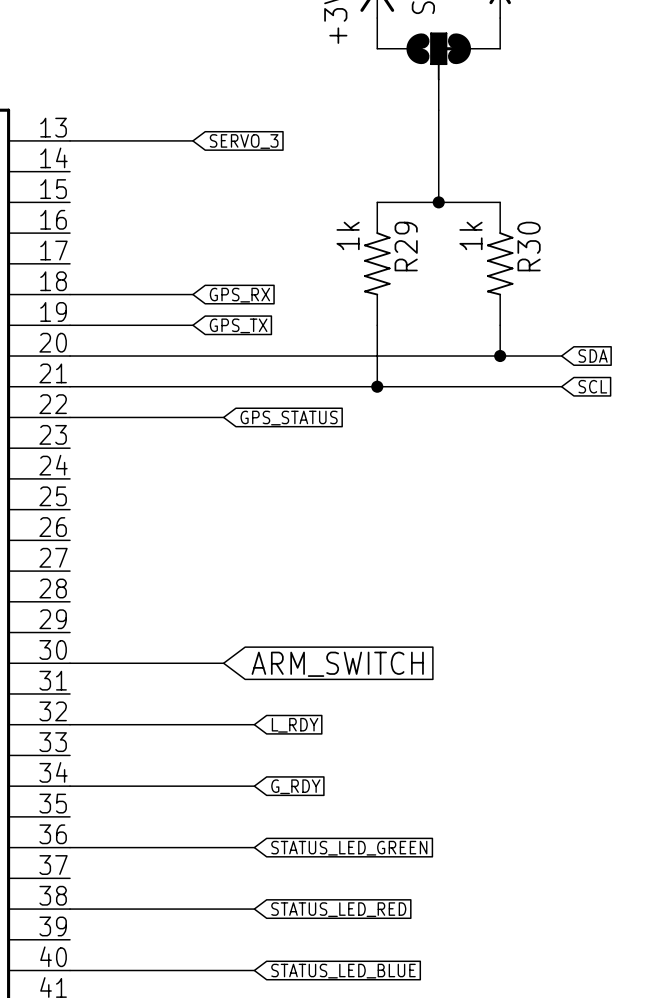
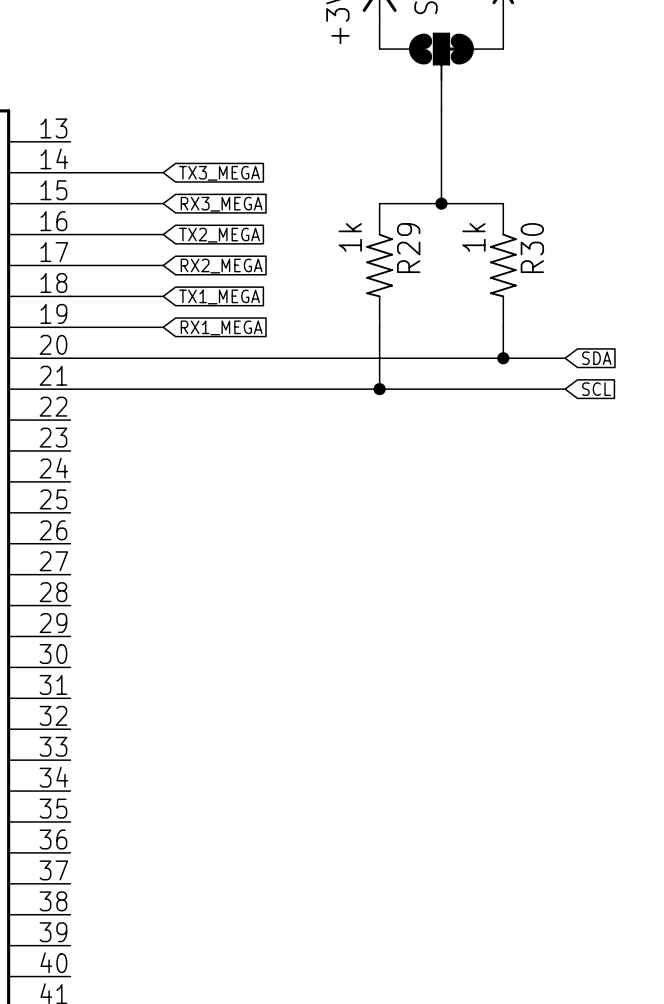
wire: (70, 140) (192, 140) -> none
global label: SERVO_3 (244, 141) -> none
wire: none -> (70, 172) (163, 172)
global label: none -> TX3_MEGA (219, 173)
wire: none -> (70, 203) (163, 203)
global label: none -> RX3_MEGA (221, 204)
wire: none -> (70, 234) (163, 234)
global label: none -> TX2_MEGA (219, 235)
wire: none -> (70, 265) (163, 265)
global label: none -> RX2_MEGA (221, 266)
wire: (162, 294) (192, 294) -> none
global label: none -> TX1_MEGA (219, 296)
global label: GPS_RX (239, 295) -> none
wire: (162, 325) (192, 325) -> none
global label: none -> RX1_MEGA (221, 327)
global label: GPS_TX (238, 325) -> none
wire: (70, 417) (223, 417) -> none
global label: GPS_STATUS (289, 418) -> none
wire: (70, 663) (223, 663) -> none
global label: ARM_SWITCH (337, 664) -> none
wire: (70, 724) (254, 724) -> none
global label: L_RDY (295, 725) -> none
wire: (70, 786) (254, 786) -> none
global label: G_RDY (295, 786) -> none
wire: (70, 847) (254, 847) -> none
global label: STATUS_LED_GREEN (349, 848) -> none
wire: (70, 909) (254, 909) -> none
global label: STATUS_LED_RED (338, 909) -> none
wire: (70, 970) (254, 970) -> none
global label: STATUS_LED_BLUE (343, 971) -> none

